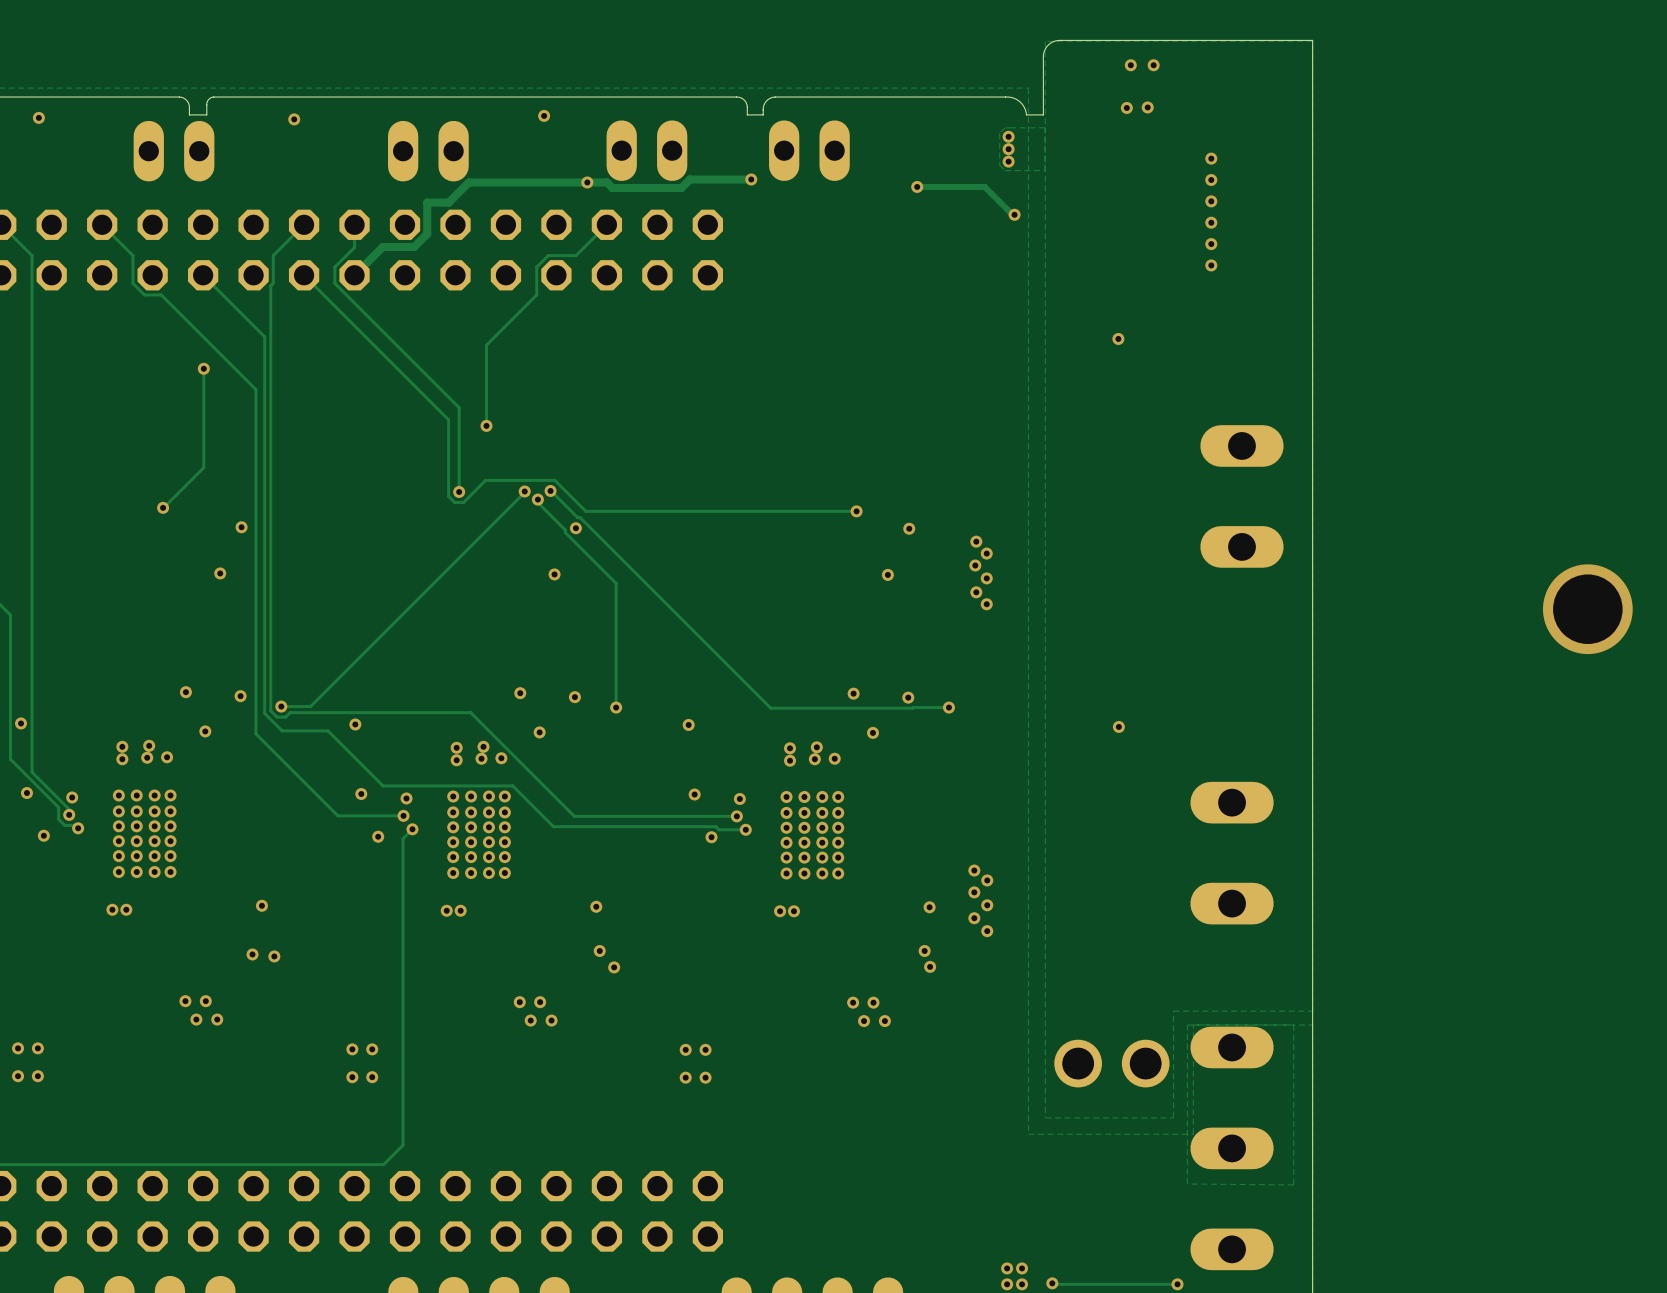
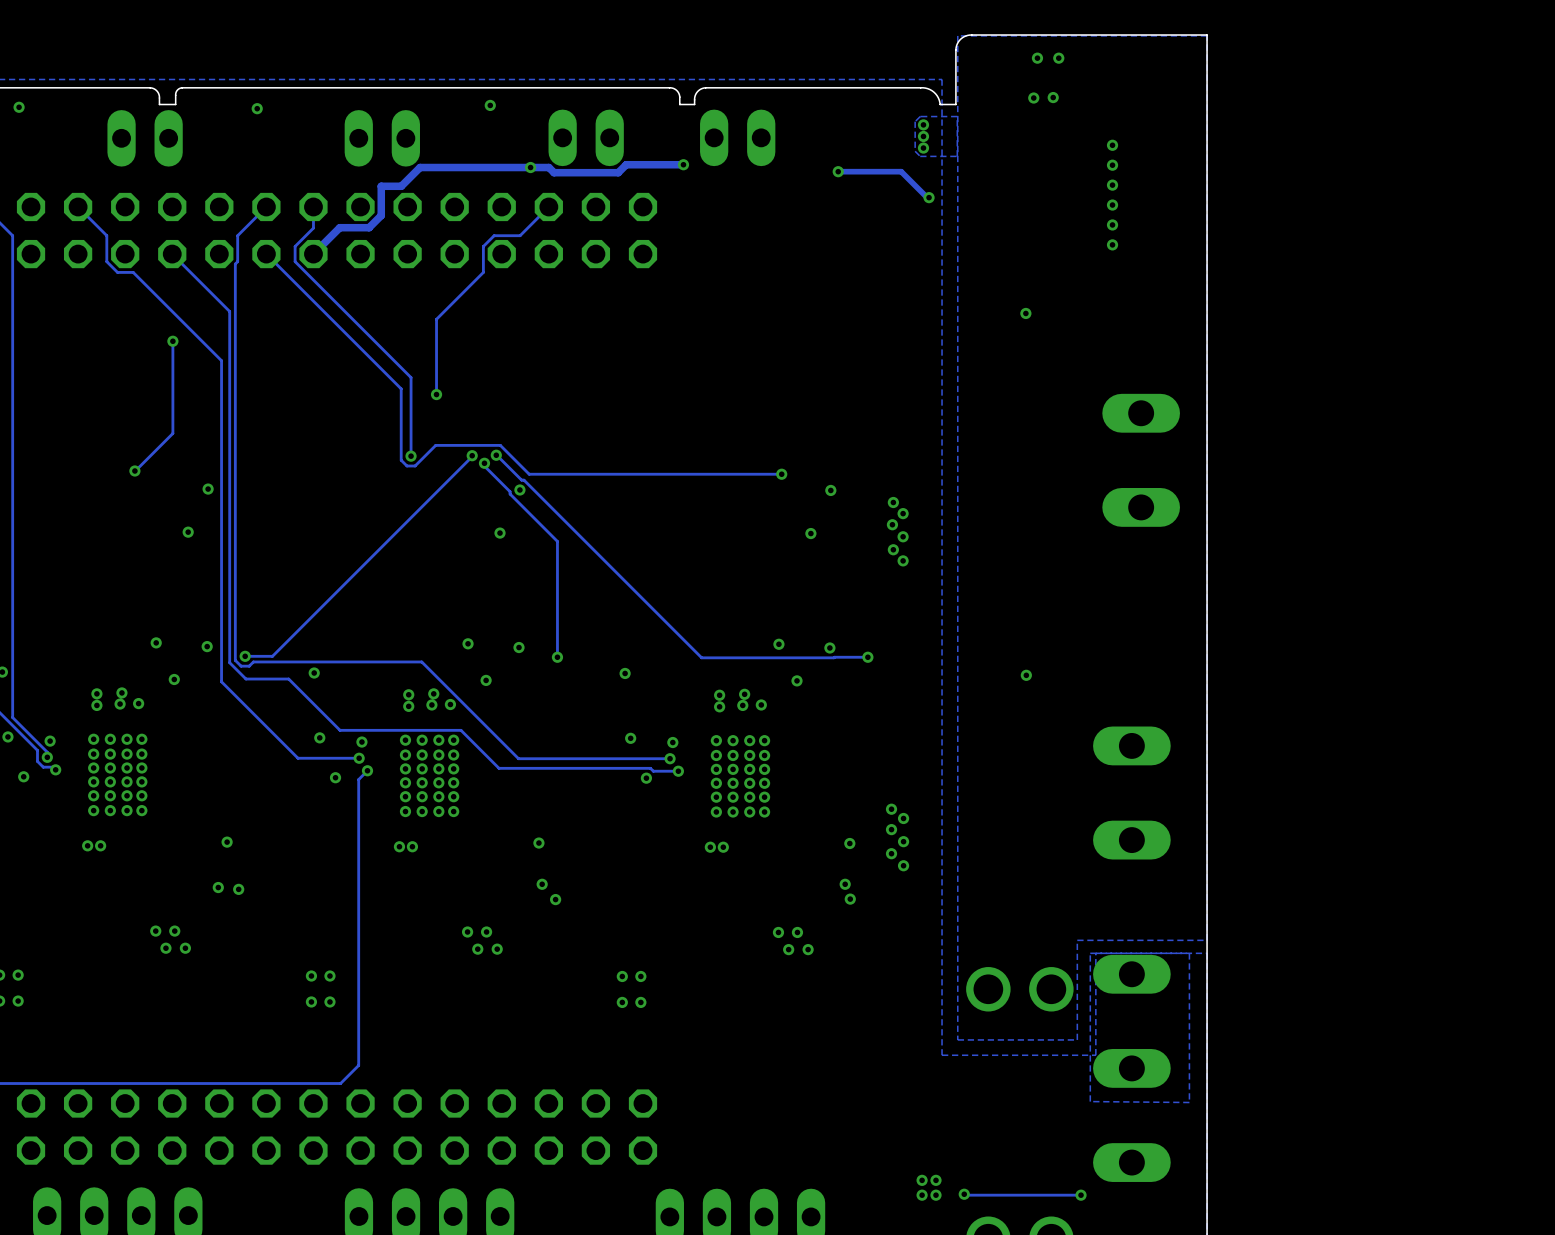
via: (1587, 609) -> none

